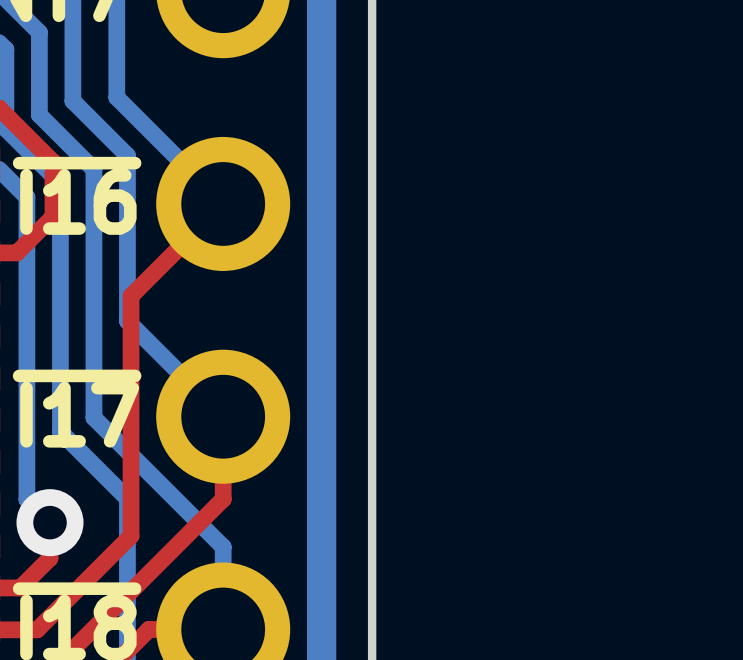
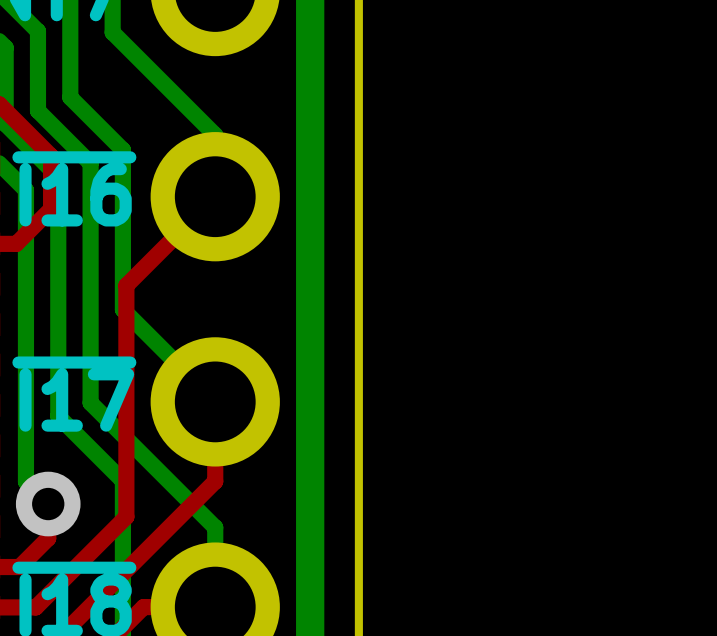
bottom track: (116, 33) (116, 97) (223, 203) -> (112, 32) (215, 135) (215, 196)

